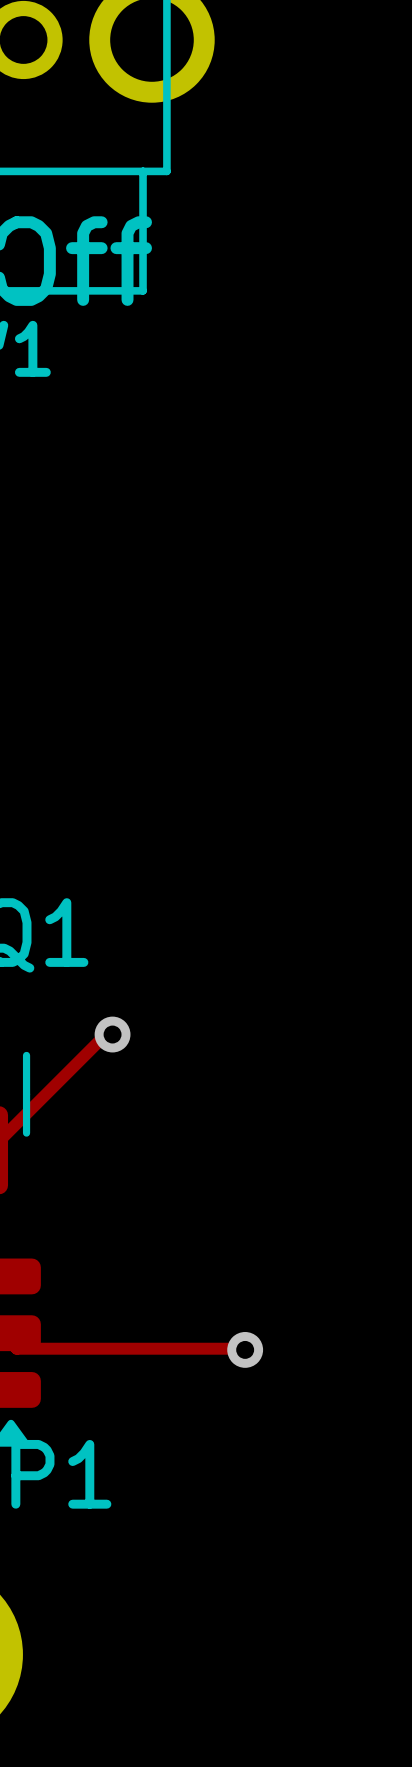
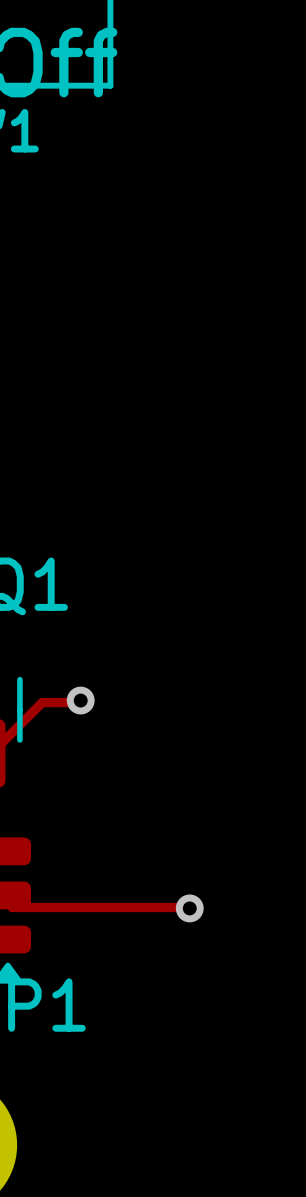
track: (112, 1034) (105, 1034) (55, 1084) -> (79, 702) (42, 702)
via position: (112, 1034) -> (80, 700)

